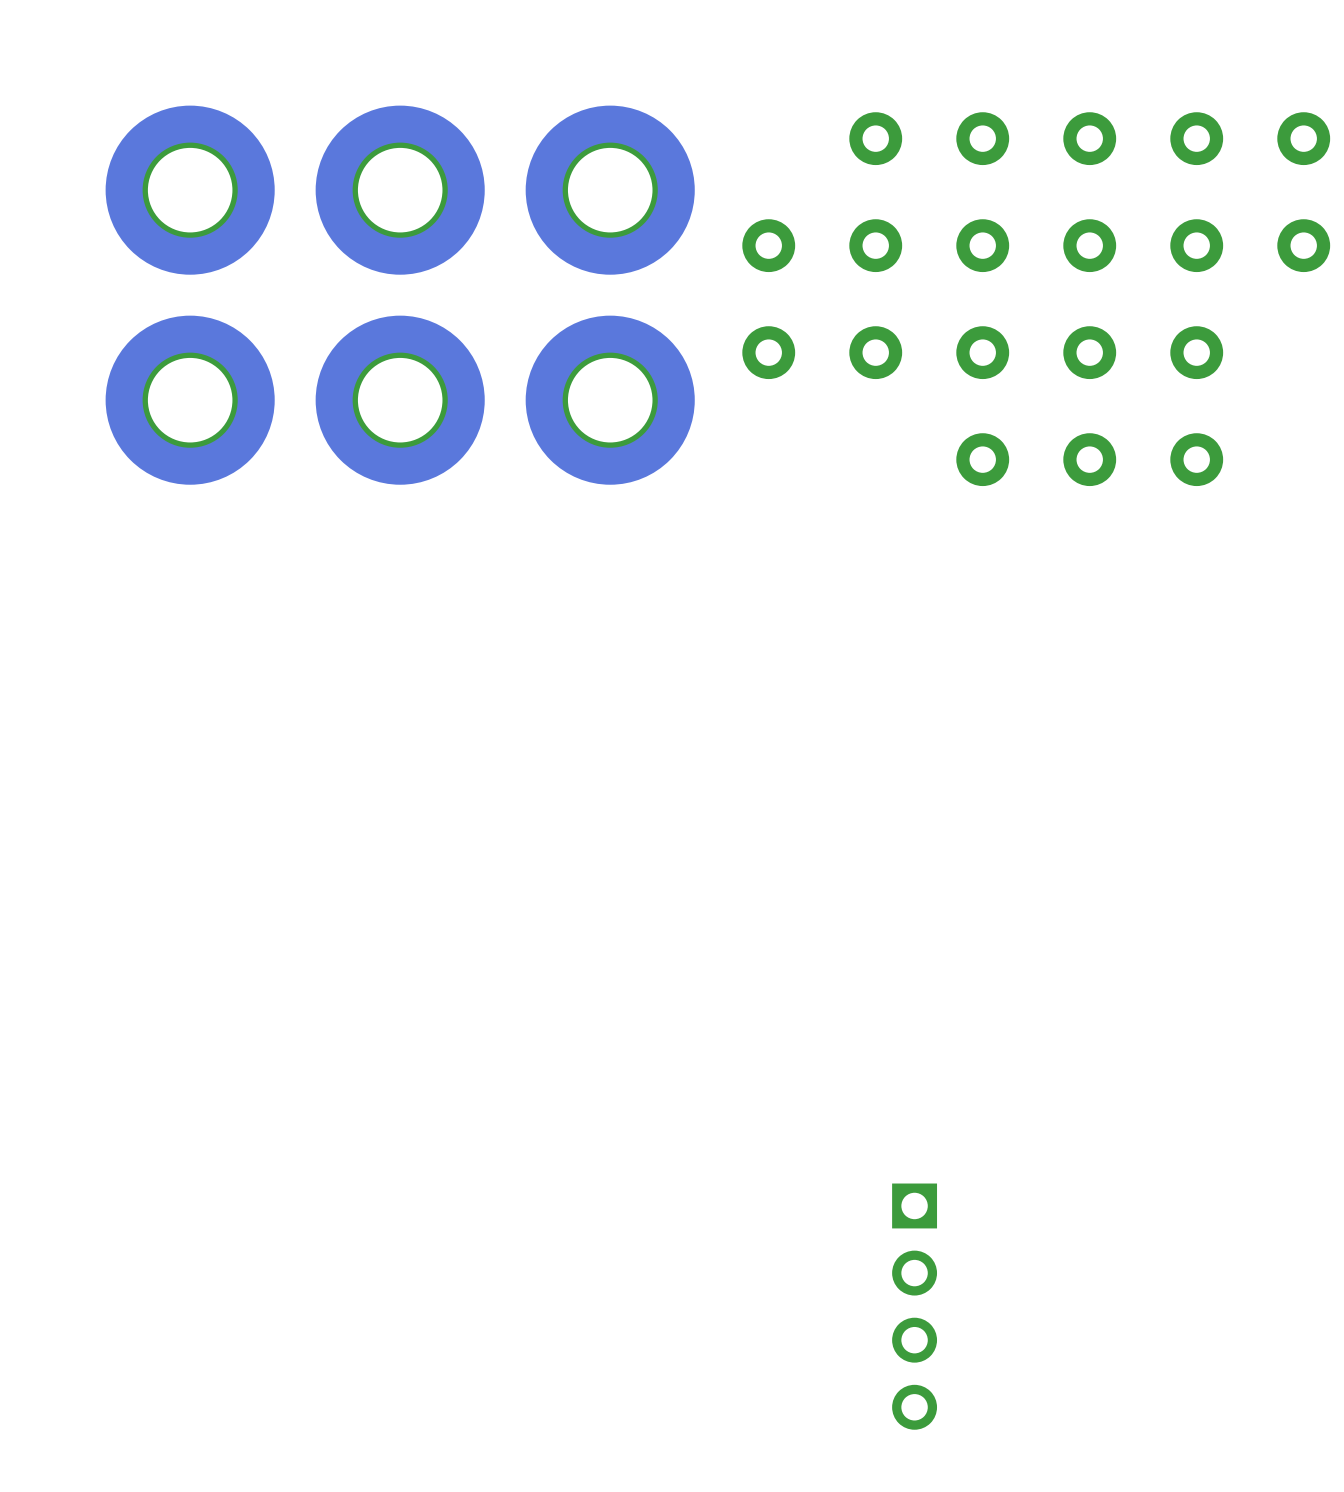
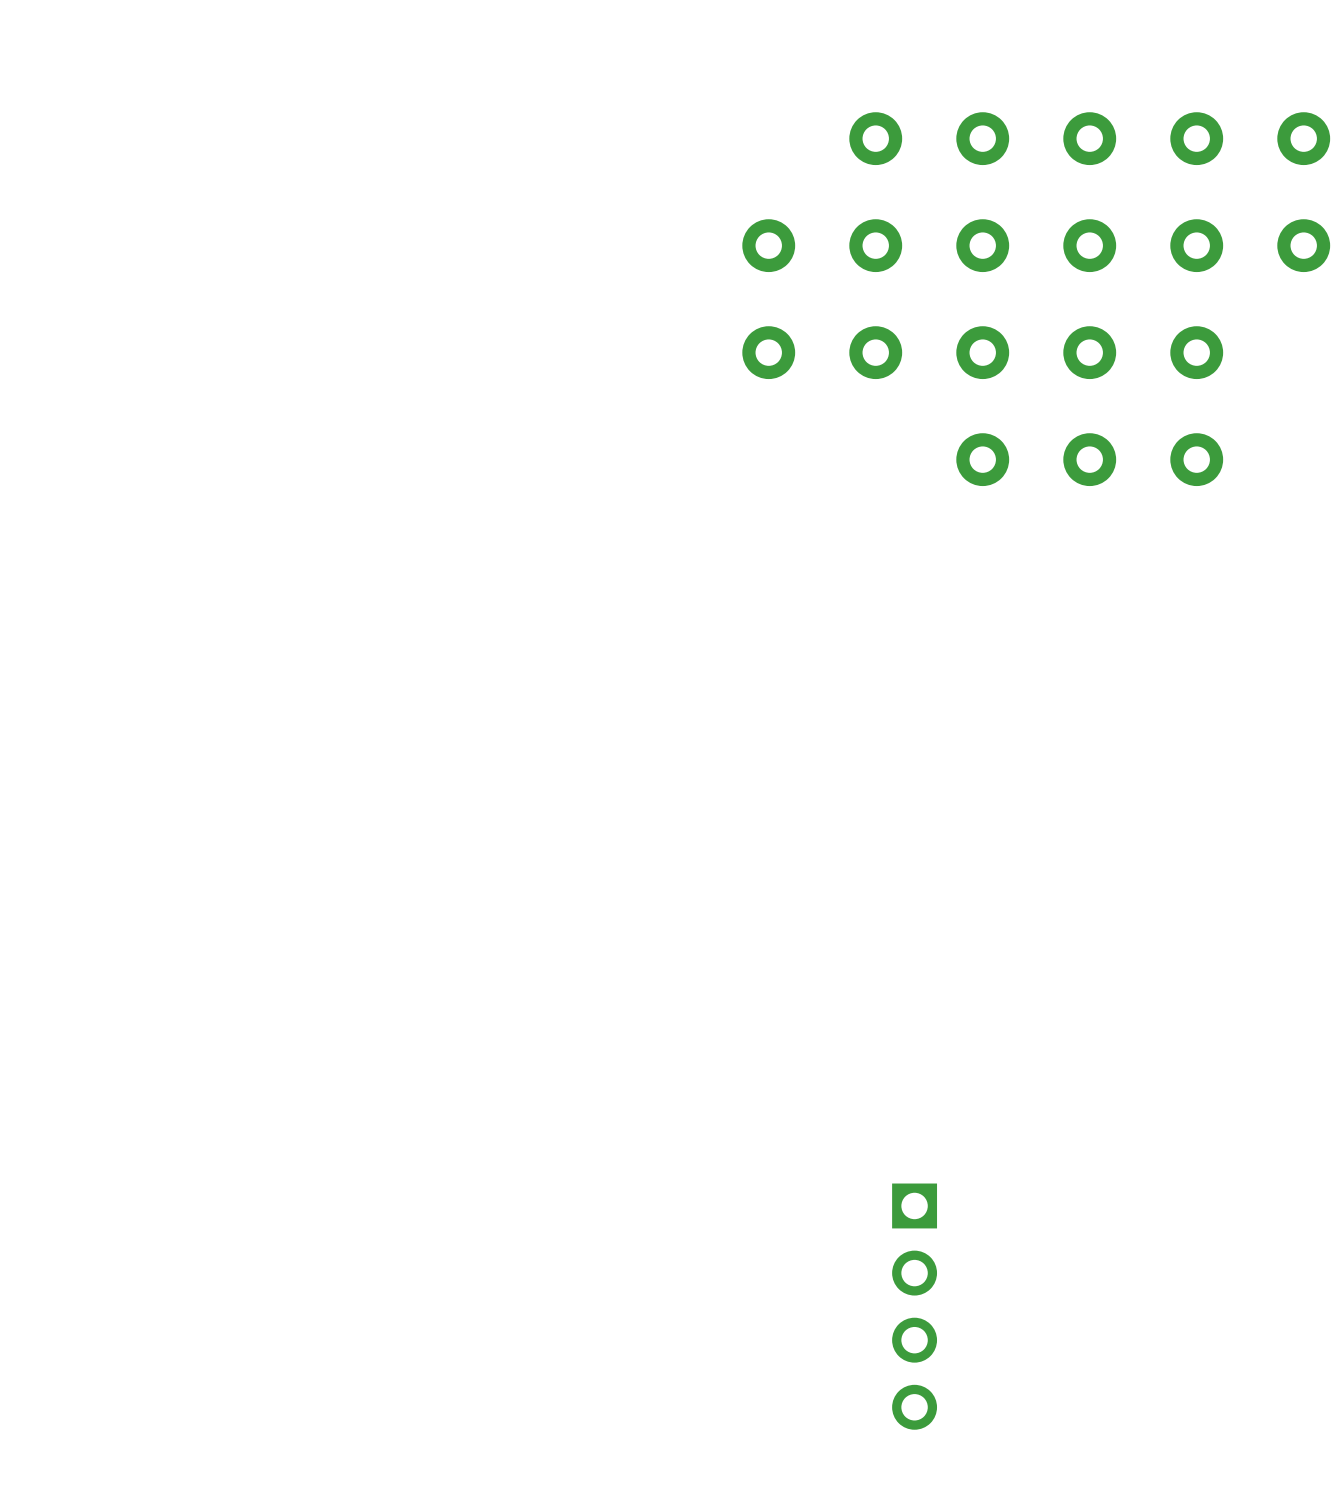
part: (190, 190) -> none
part: (400, 190) -> none
part: (610, 190) -> none
part: (190, 400) -> none
part: (400, 400) -> none
part: (610, 400) -> none

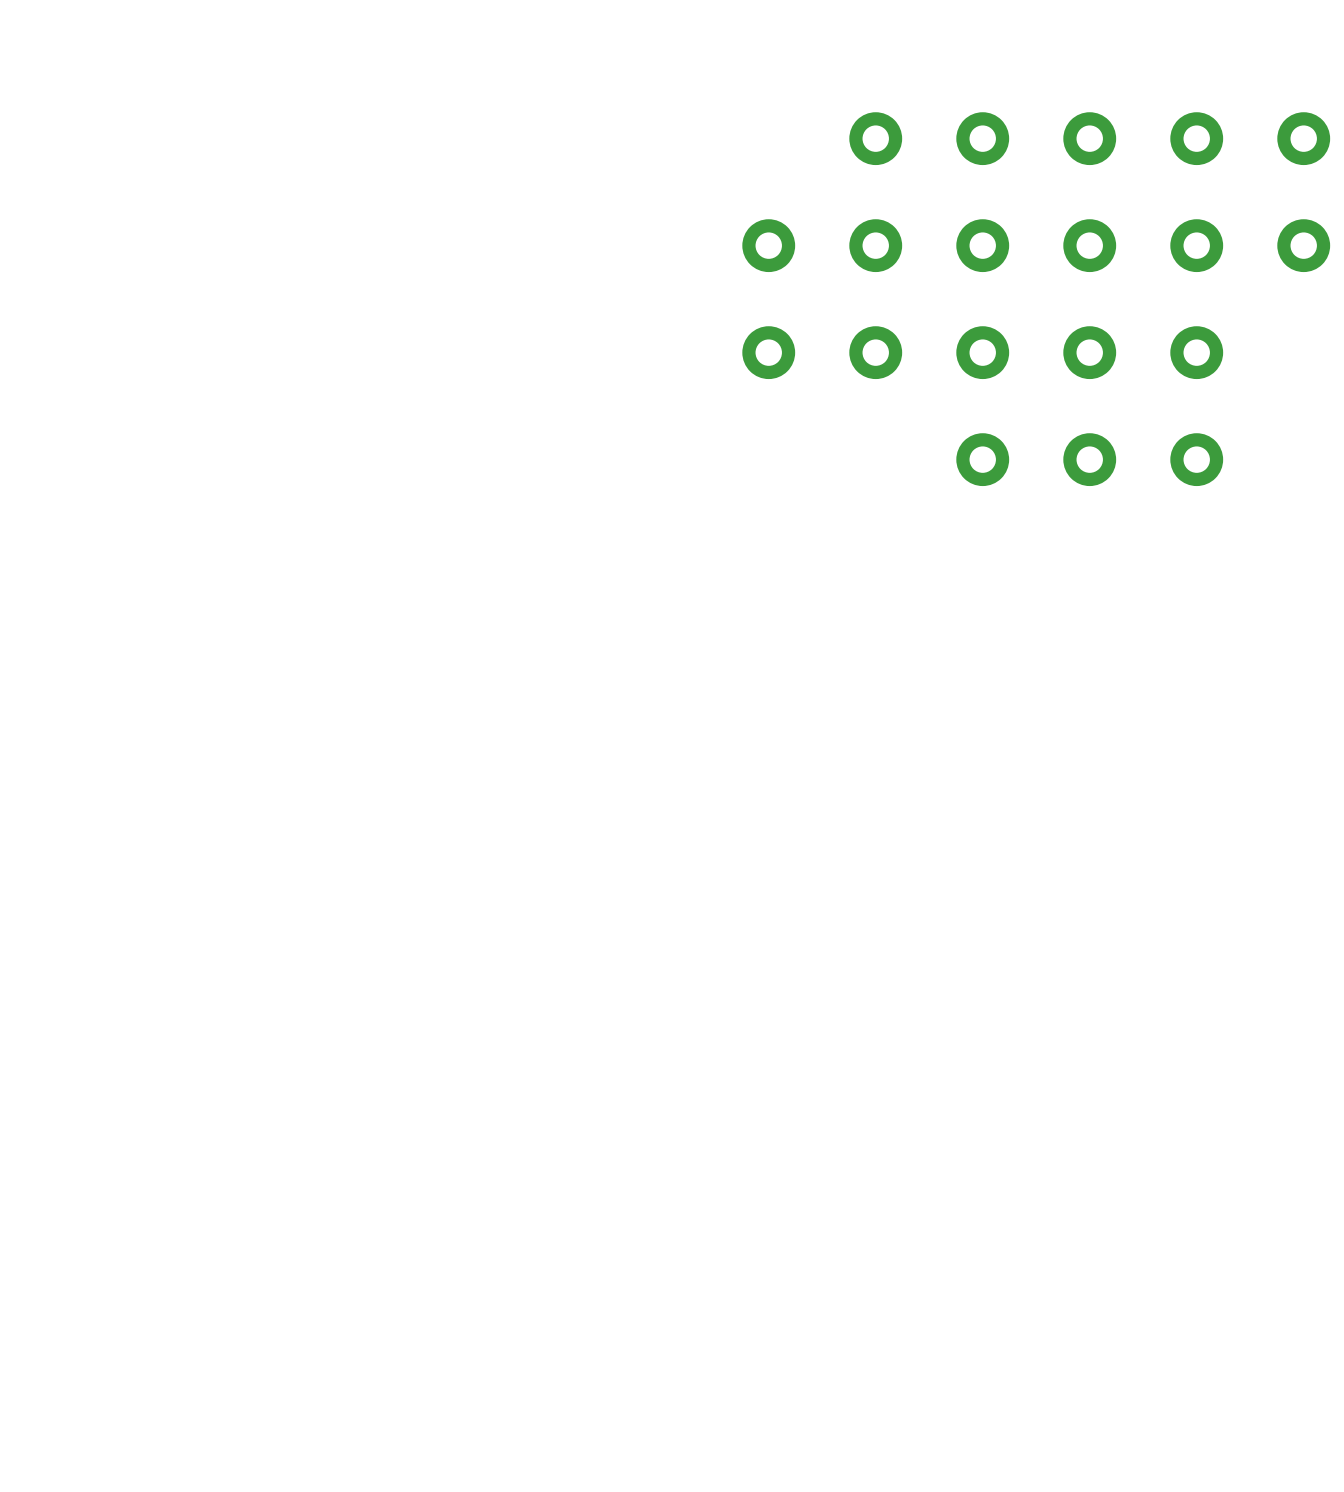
part: (914, 1306) -> none

